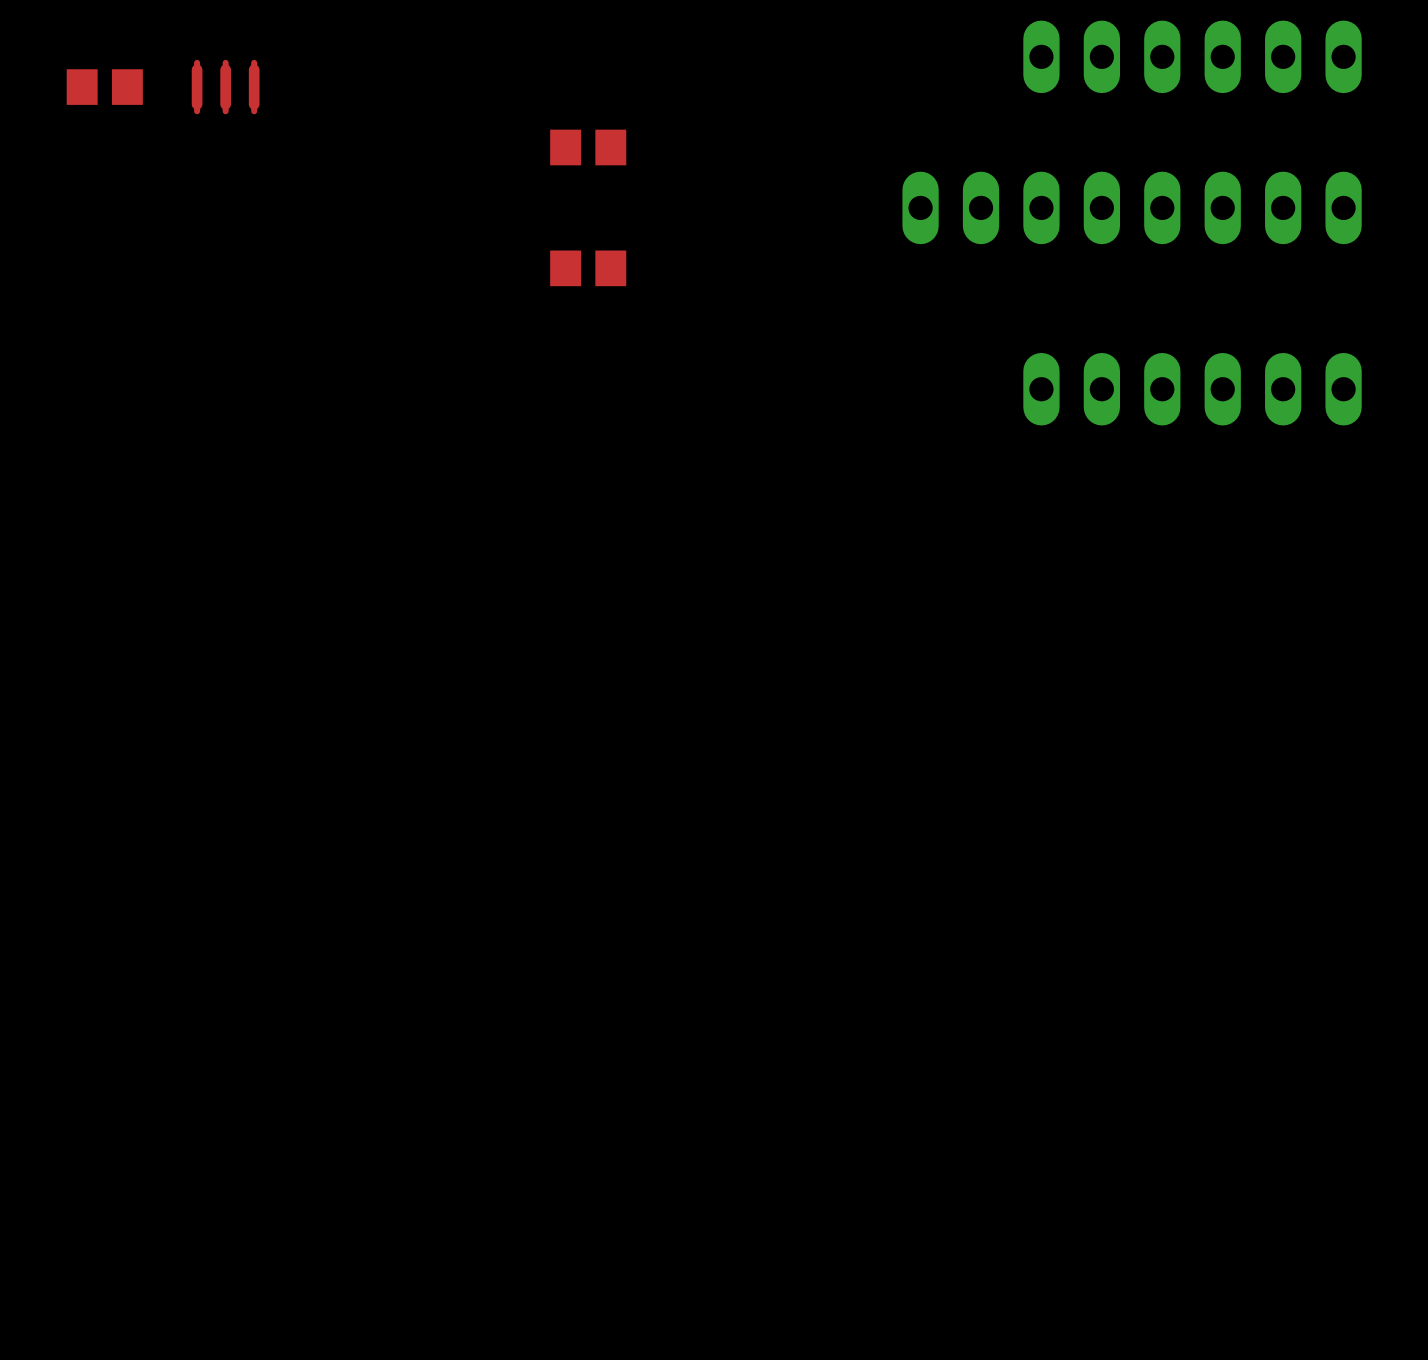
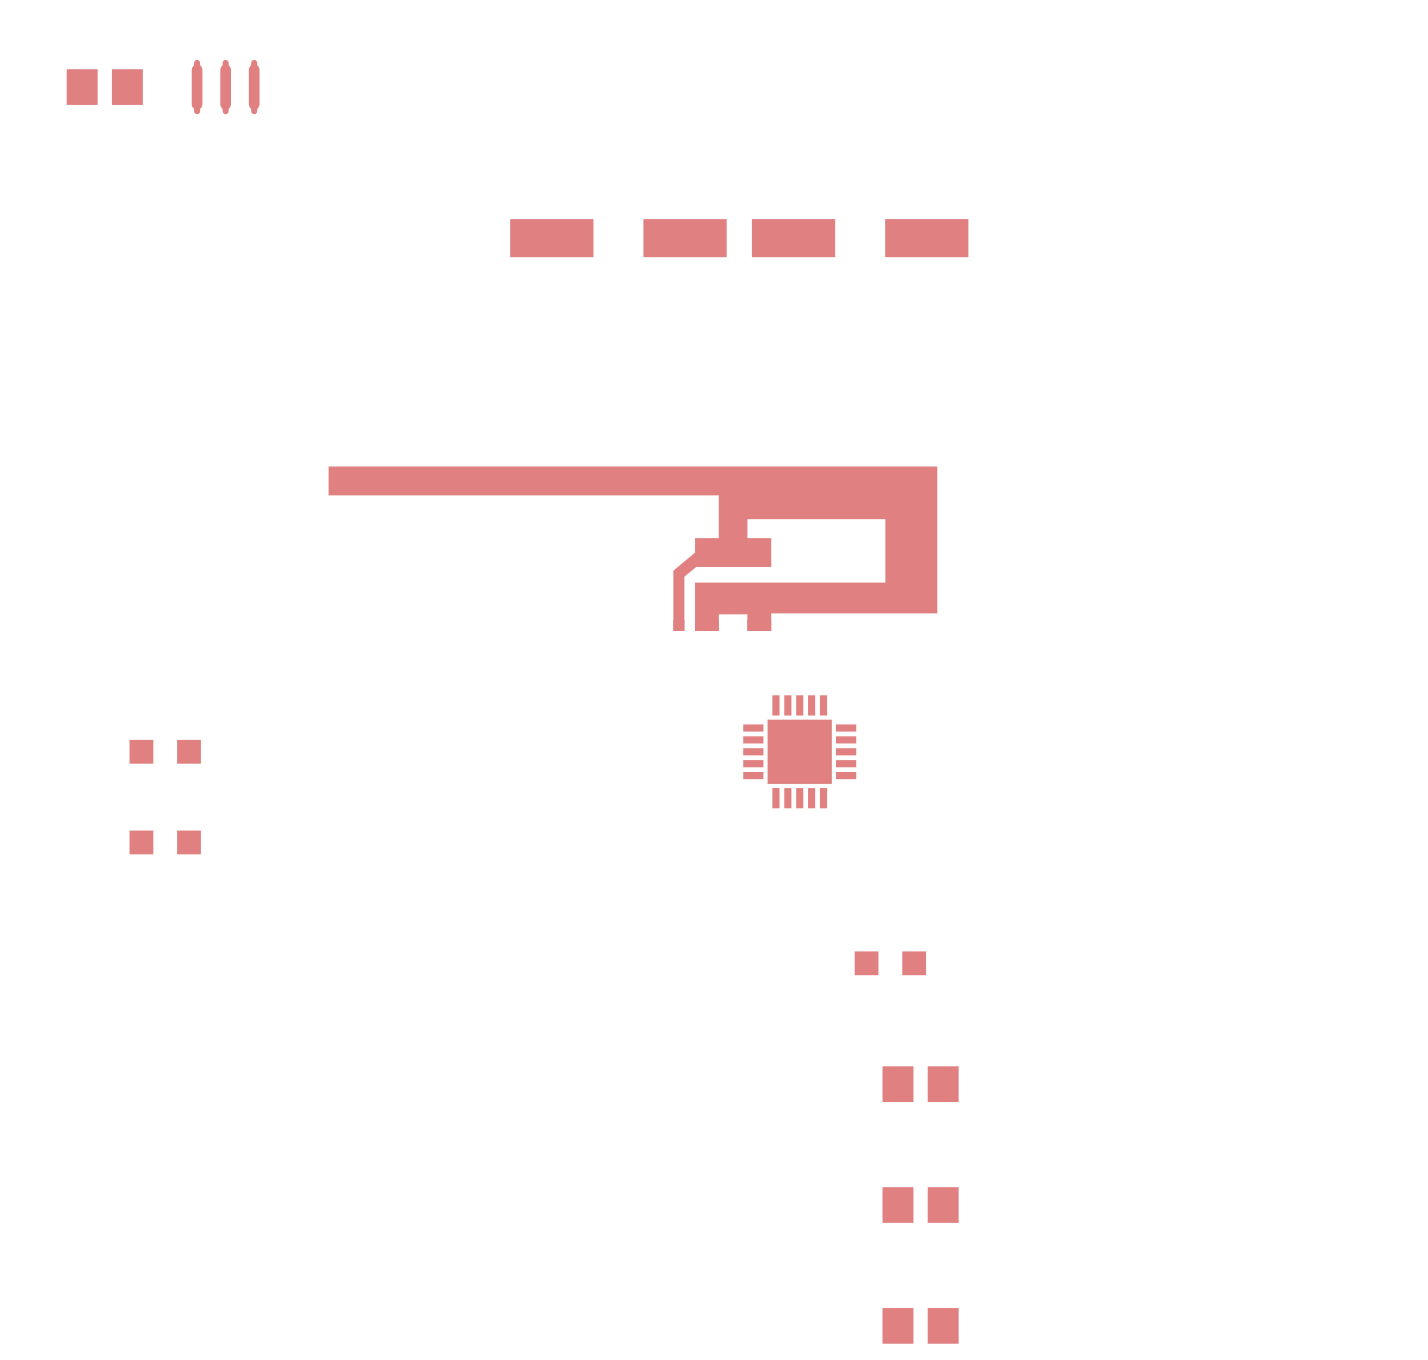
part: (1192, 56) -> none
part: (588, 147) -> none
part: (1132, 207) -> none
part: none -> (618, 238)
part: none -> (860, 238)
part: (588, 268) -> none
part: (1192, 389) -> none
part: none -> (632, 548)
part: none -> (165, 751)
part: none -> (799, 751)
part: none -> (165, 842)
part: none -> (890, 963)
part: none -> (920, 1084)
part: none -> (920, 1205)
part: none -> (920, 1325)

